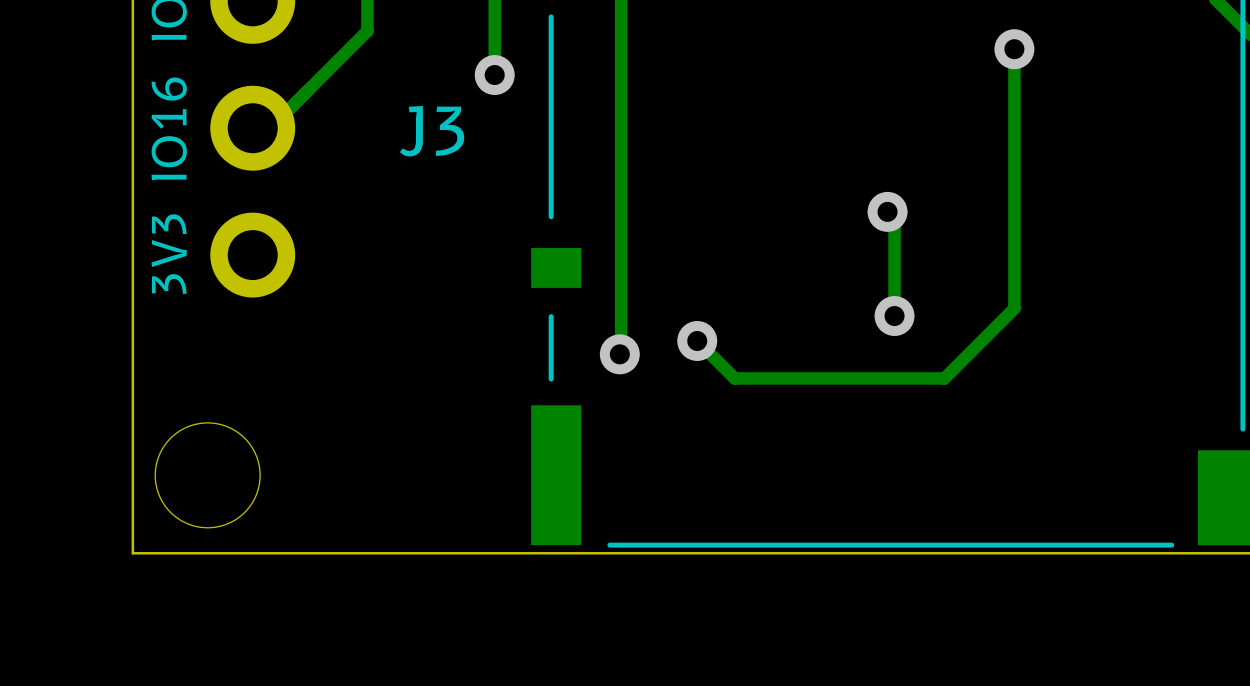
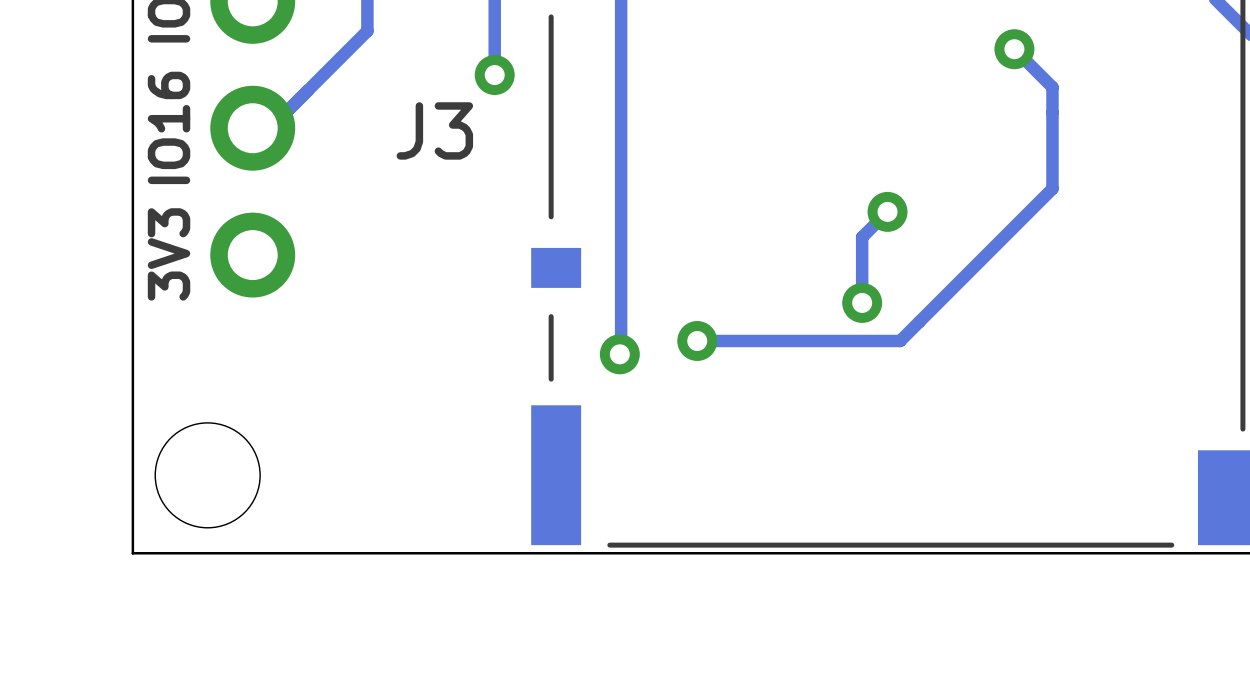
track: (1014, 49) (1014, 308) (944, 378) (734, 378) (697, 340) -> (1014, 49) (1052, 87) (1052, 188) (900, 340) (697, 340)
track: (887, 211) (894, 218) (894, 316) -> (887, 211) (862, 237) (862, 302)
via position: (894, 316) -> (862, 302)

